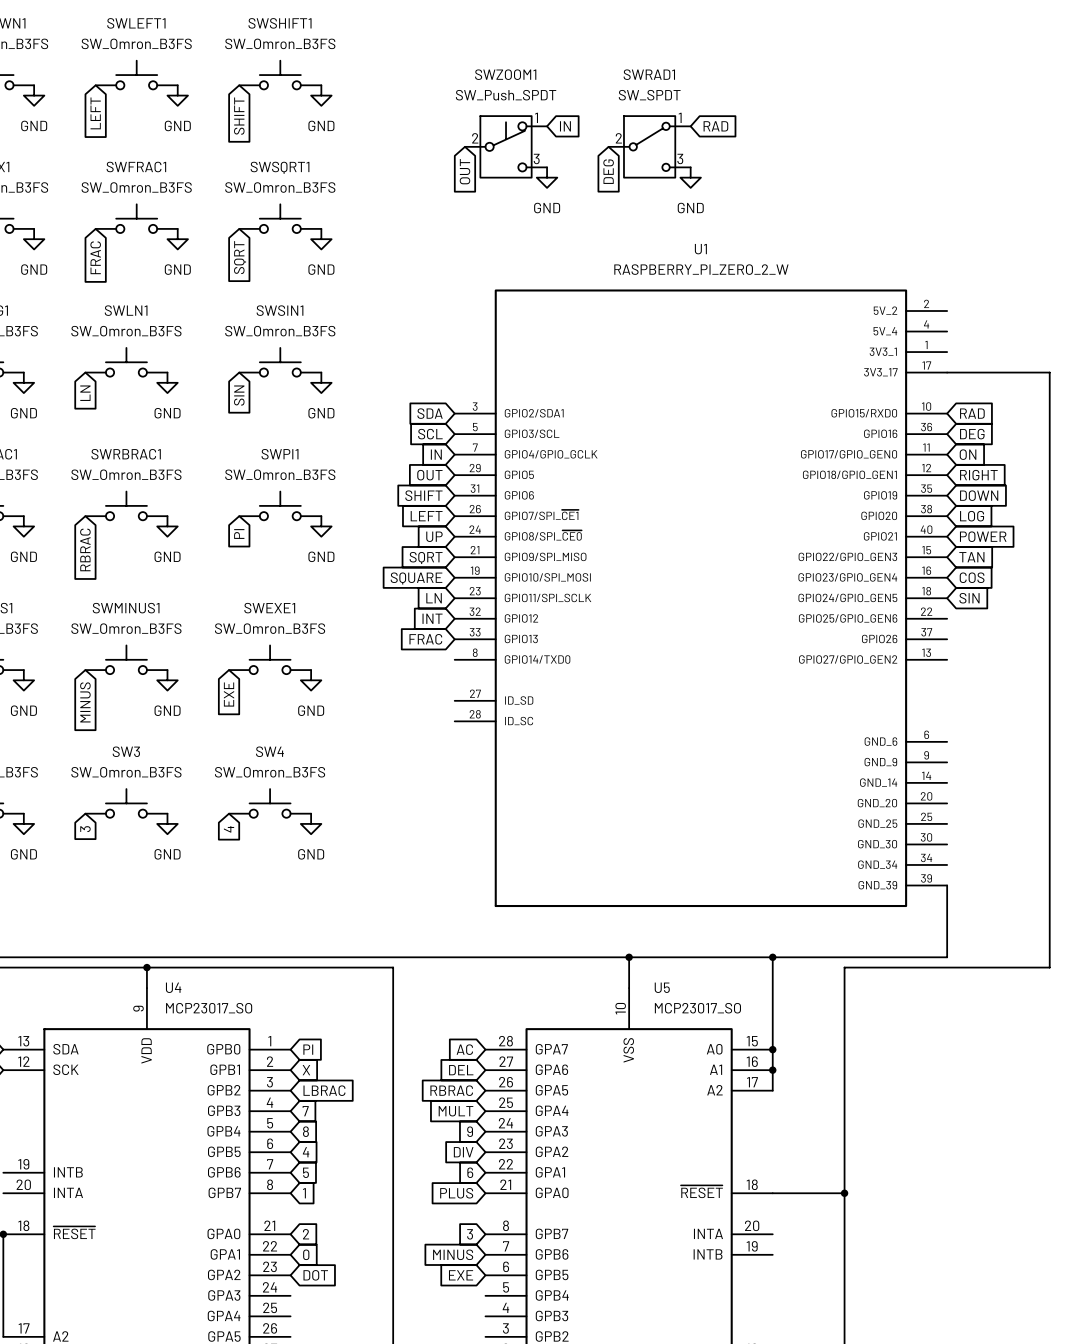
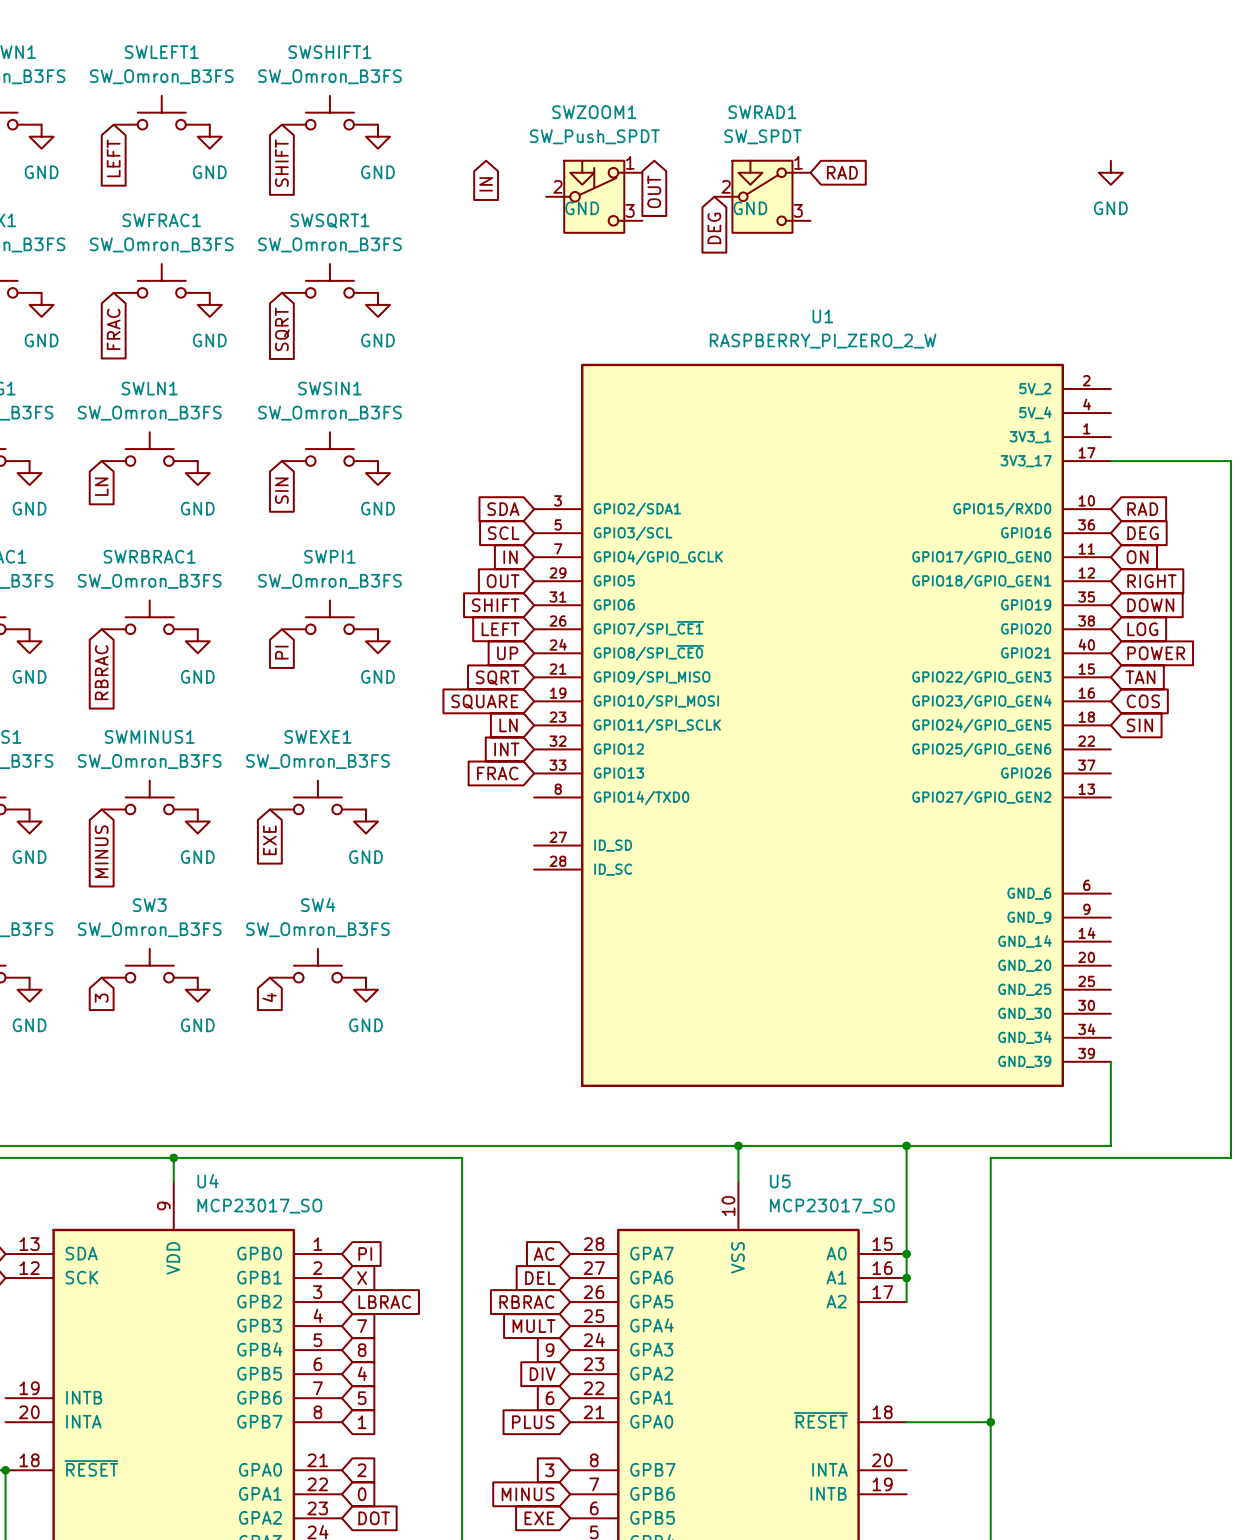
power symbol: none -> GND (582, 172)
global label rotation: 0° (565, 126) -> 90° clockwise (486, 184)
global label position: IN (565, 126) -> IN (486, 184)
power symbol: none -> GND (750, 172)
power symbol: none -> GND (1110, 172)
global label position: OUT (464, 171) -> OUT (654, 191)
power symbol: GND (547, 177) -> none
power symbol: GND (690, 177) -> none

